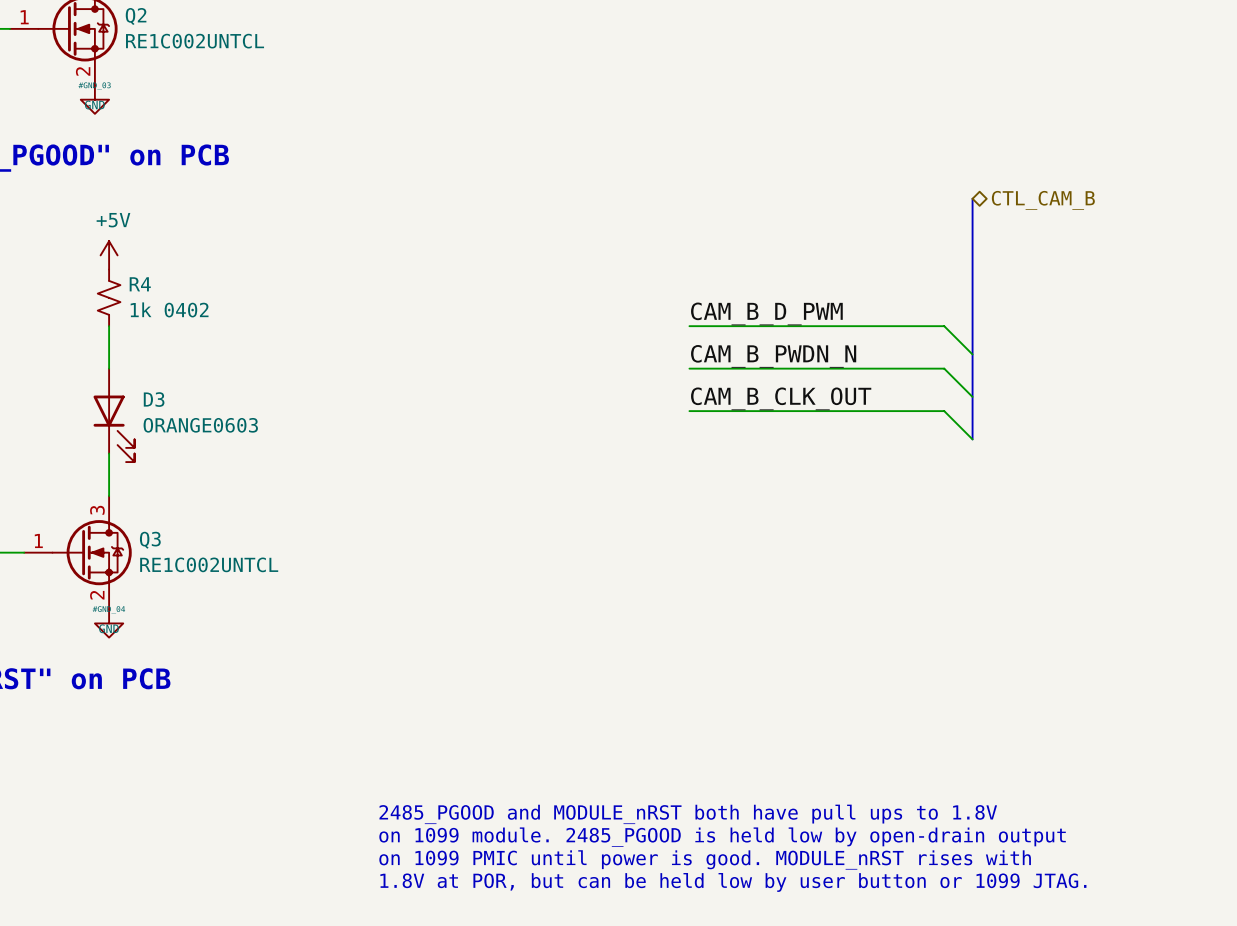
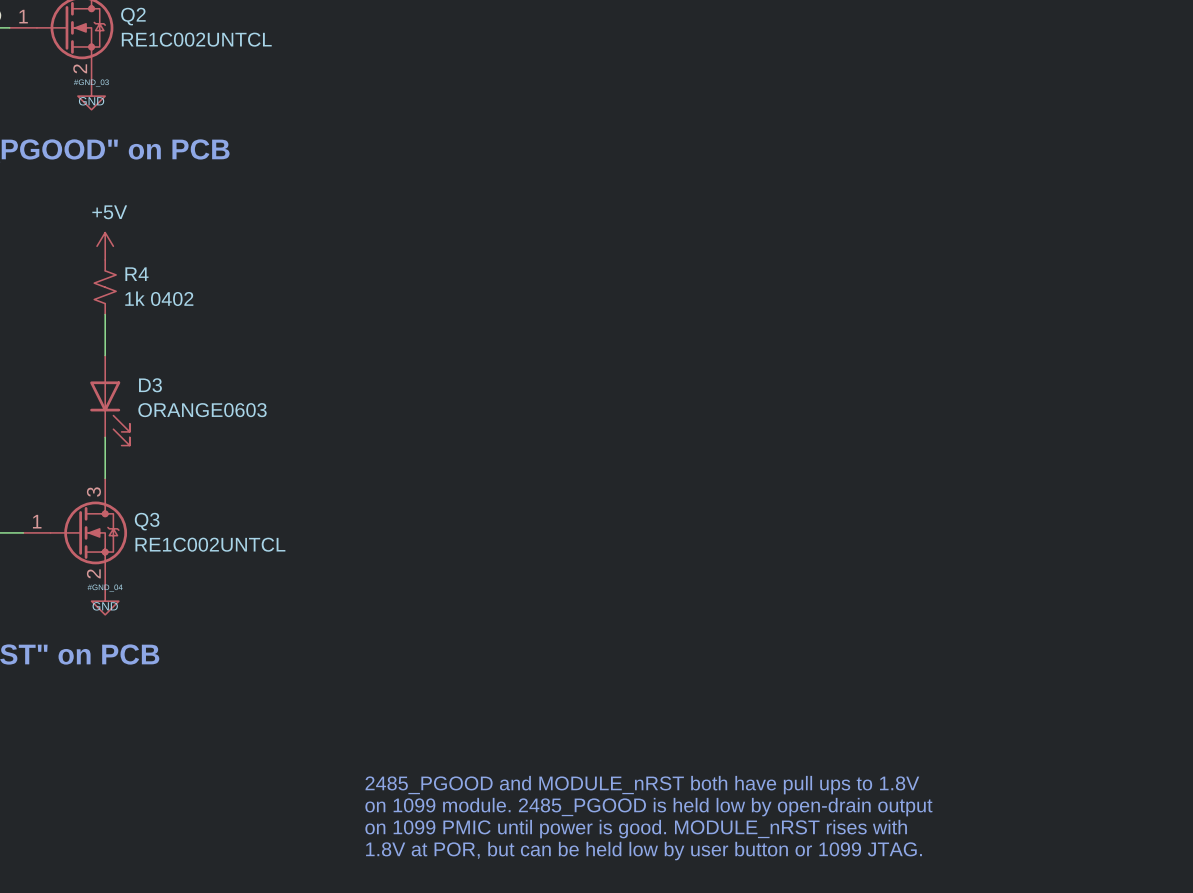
bus: (972, 198) (972, 439) -> none
hierarchical label: CTL_CAM_B (1043, 200) -> none
label: CAM_B_D_PWM (766, 313) -> none
wire: (689, 326) (944, 326) (972, 354) -> none
label: CAM_B_PWDN_N (773, 356) -> none
wire: (689, 368) (944, 368) (972, 396) -> none
label: CAM_B_CLK_OUT (781, 398) -> none
wire: (689, 411) (944, 411) (972, 439) -> none

